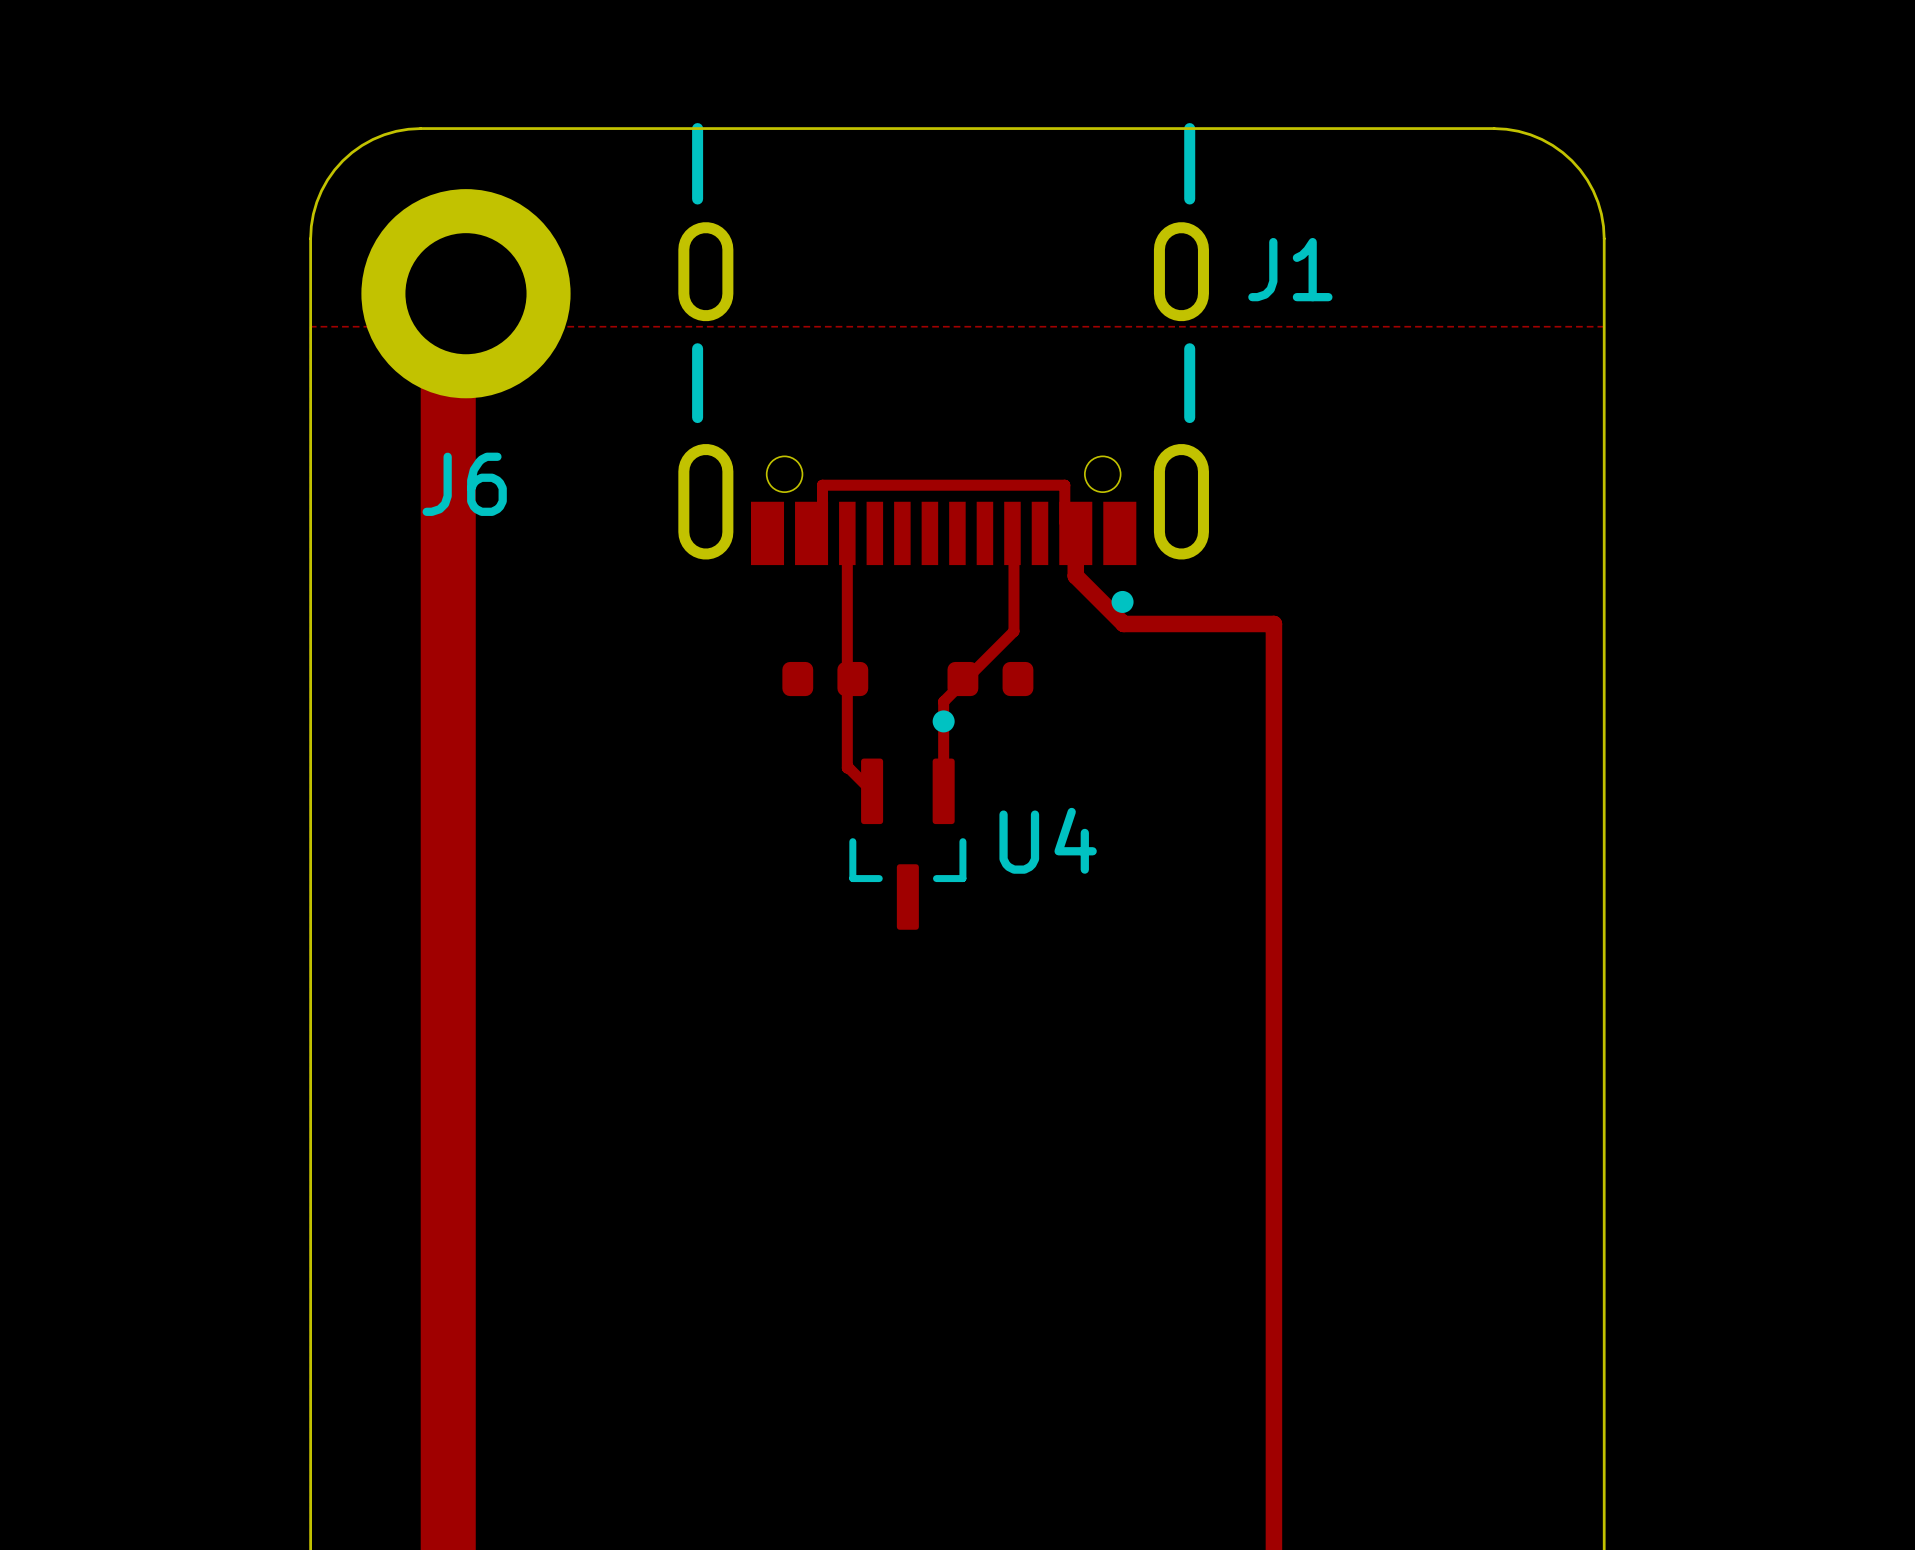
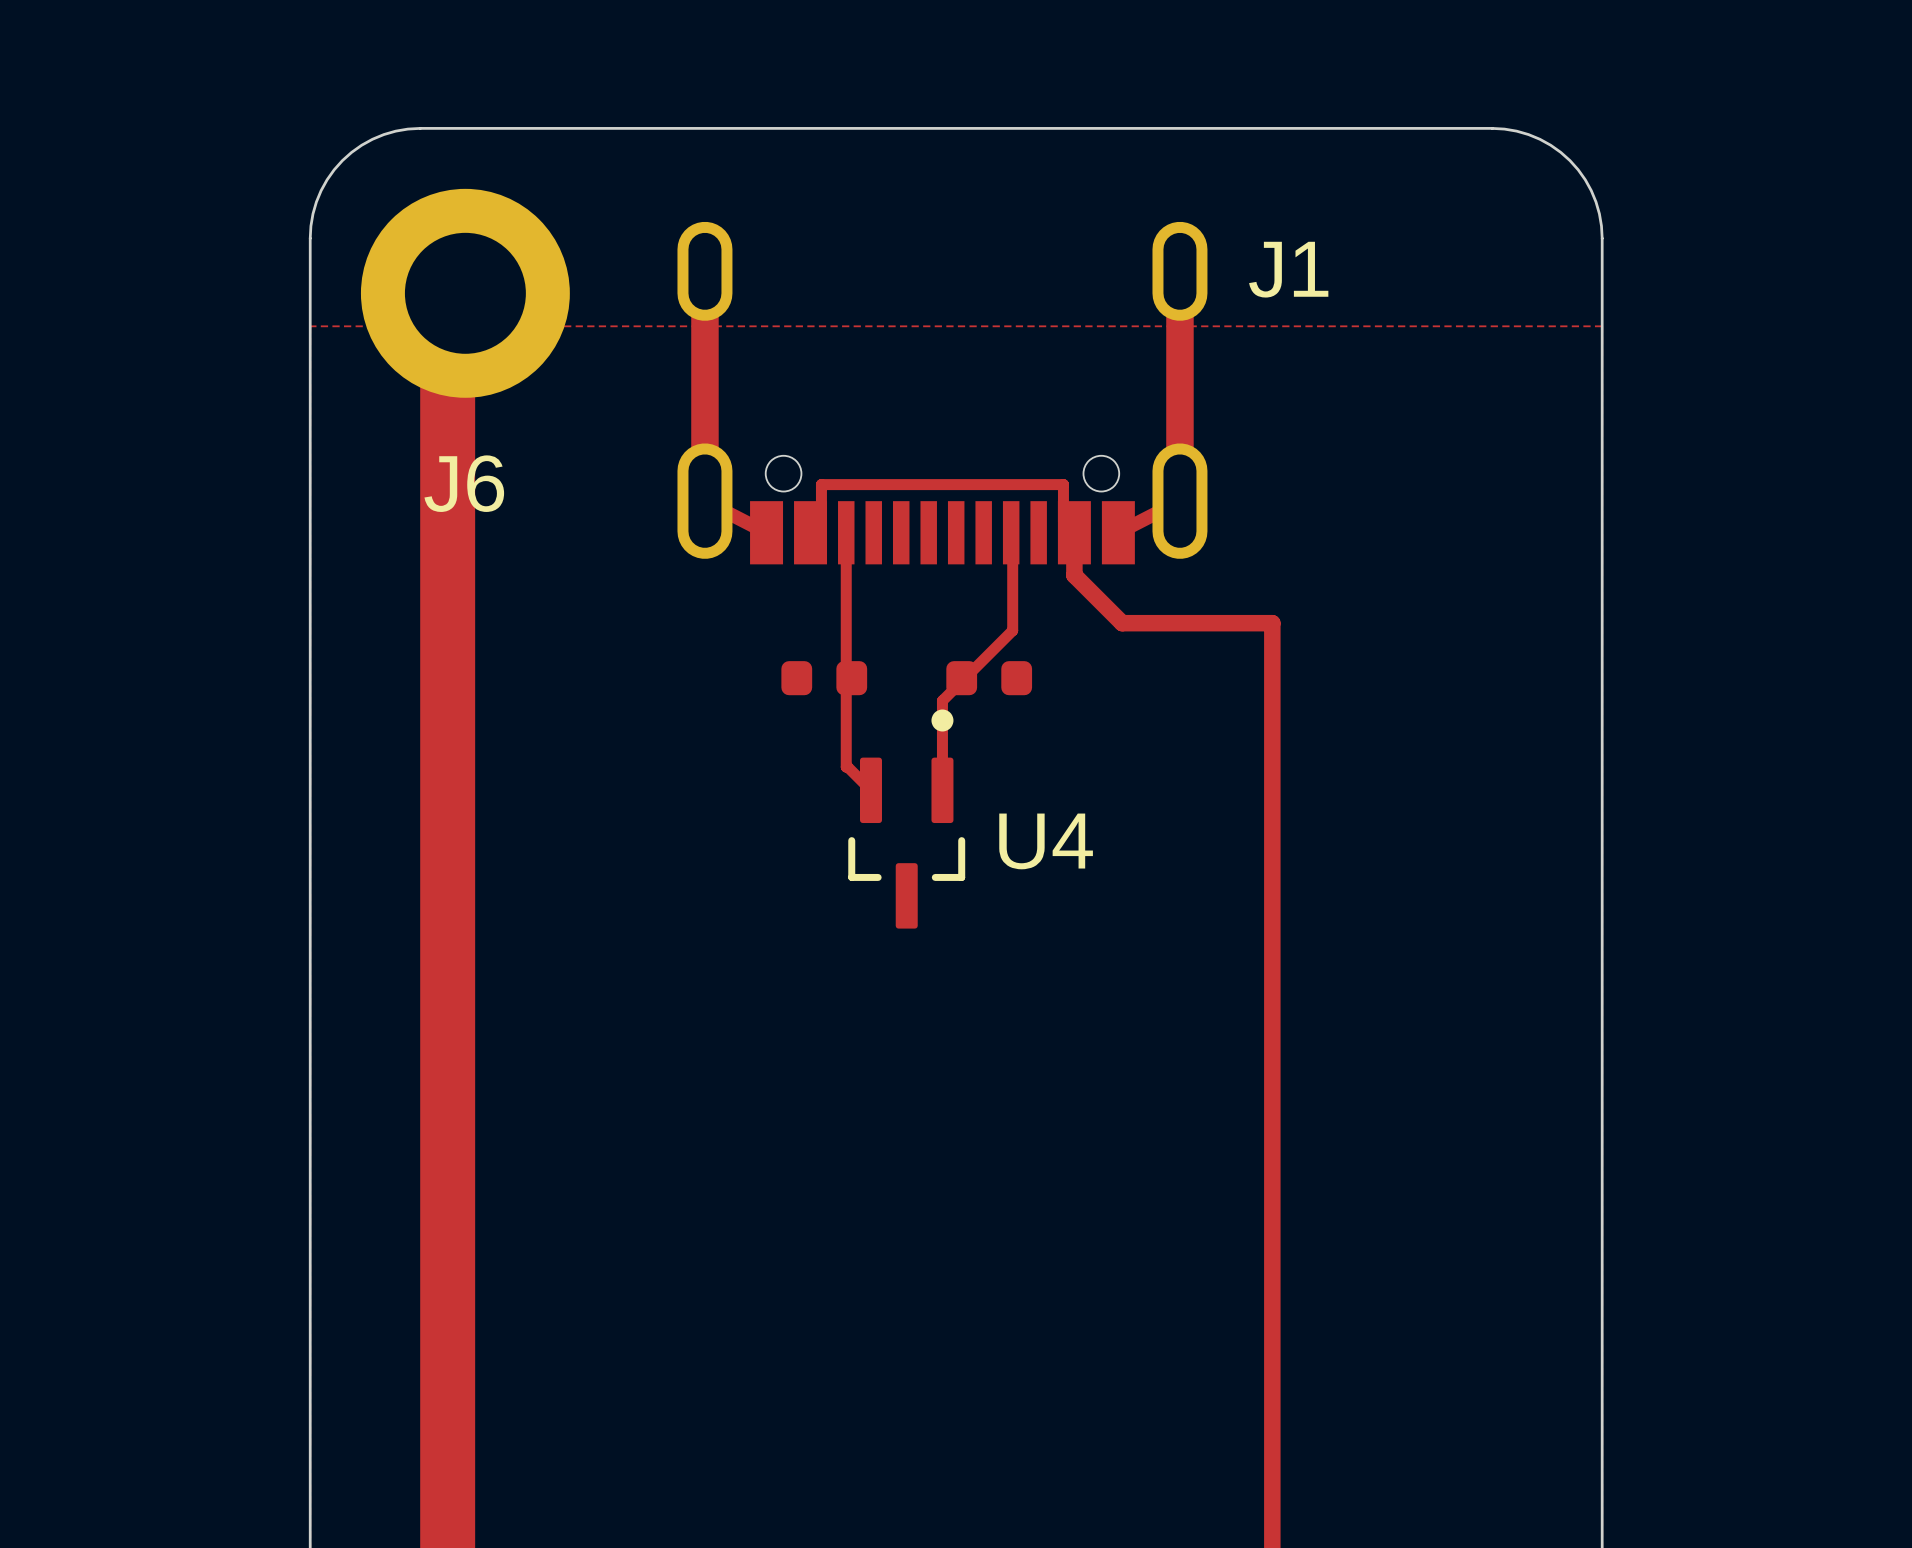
J1 footprint: [678, 123, 1209, 613] -> [677, 221, 1208, 565]
track: none -> (704, 271) (704, 501) (766, 532)
track: none -> (1179, 271) (1179, 501) (1118, 532)

